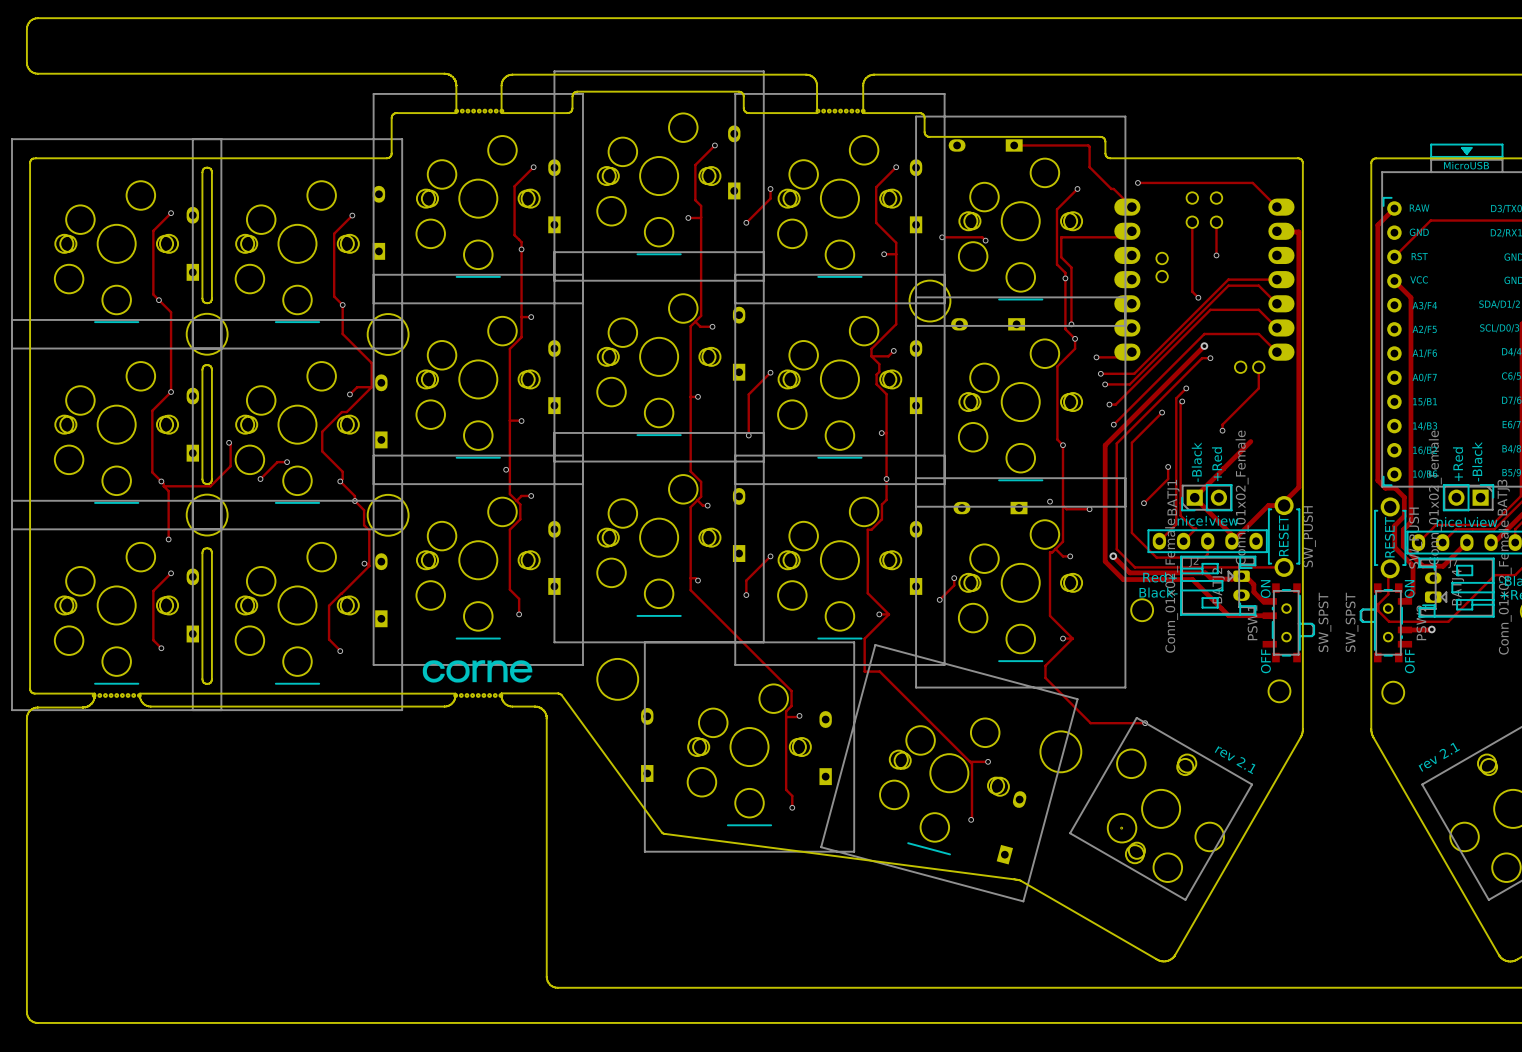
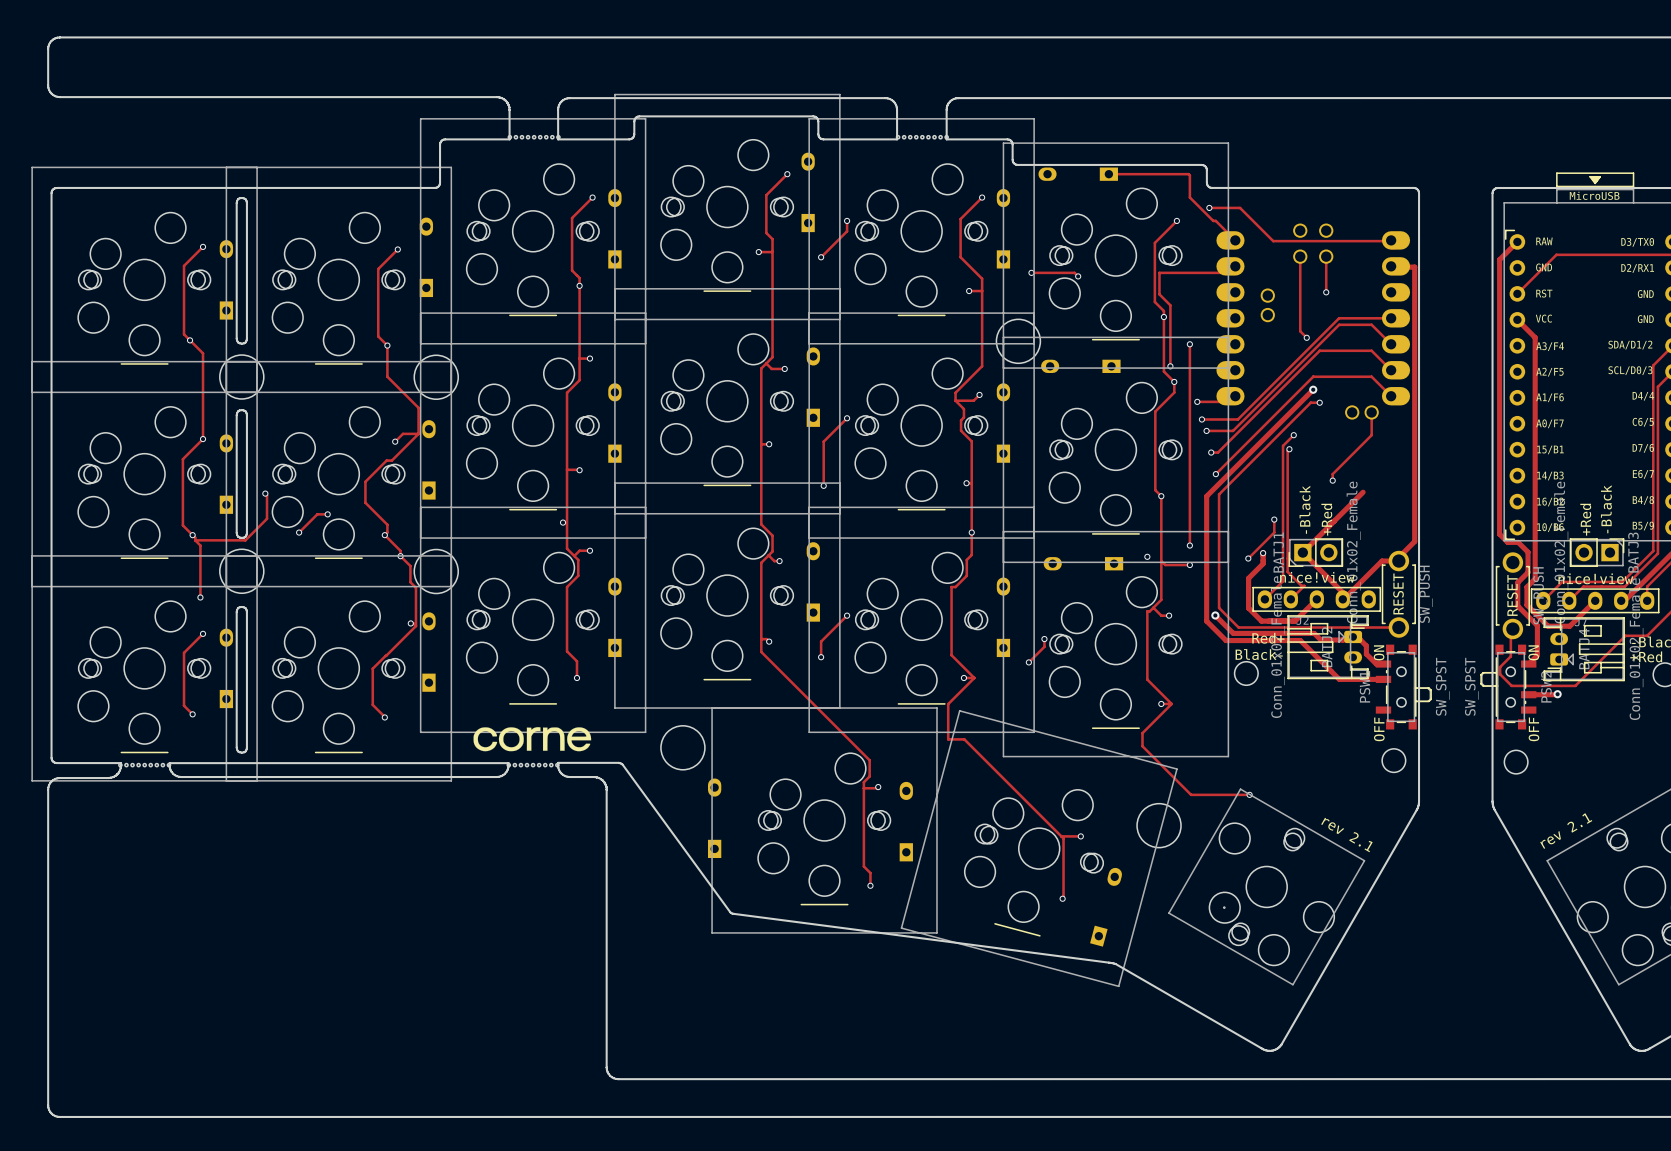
track: (1137, 182) (1252, 182) (1276, 207) -> (1209, 207) (1240, 207) (1273, 241) (1391, 240)
via position: (1137, 182) -> (1209, 207)
track: none -> (1189, 344) (1189, 545)
via: none -> (1189, 344)
track: (1162, 412) (1131, 442) (1131, 532) (1156, 557) (1204, 557) (1207, 554) (1207, 541) -> (1263, 552) (1263, 563) (1248, 578) (1248, 608) (1261, 621) (1295, 621) (1316, 599)
via: (1162, 412) -> none
via: none -> (1189, 545)
via: none -> (1263, 553)

